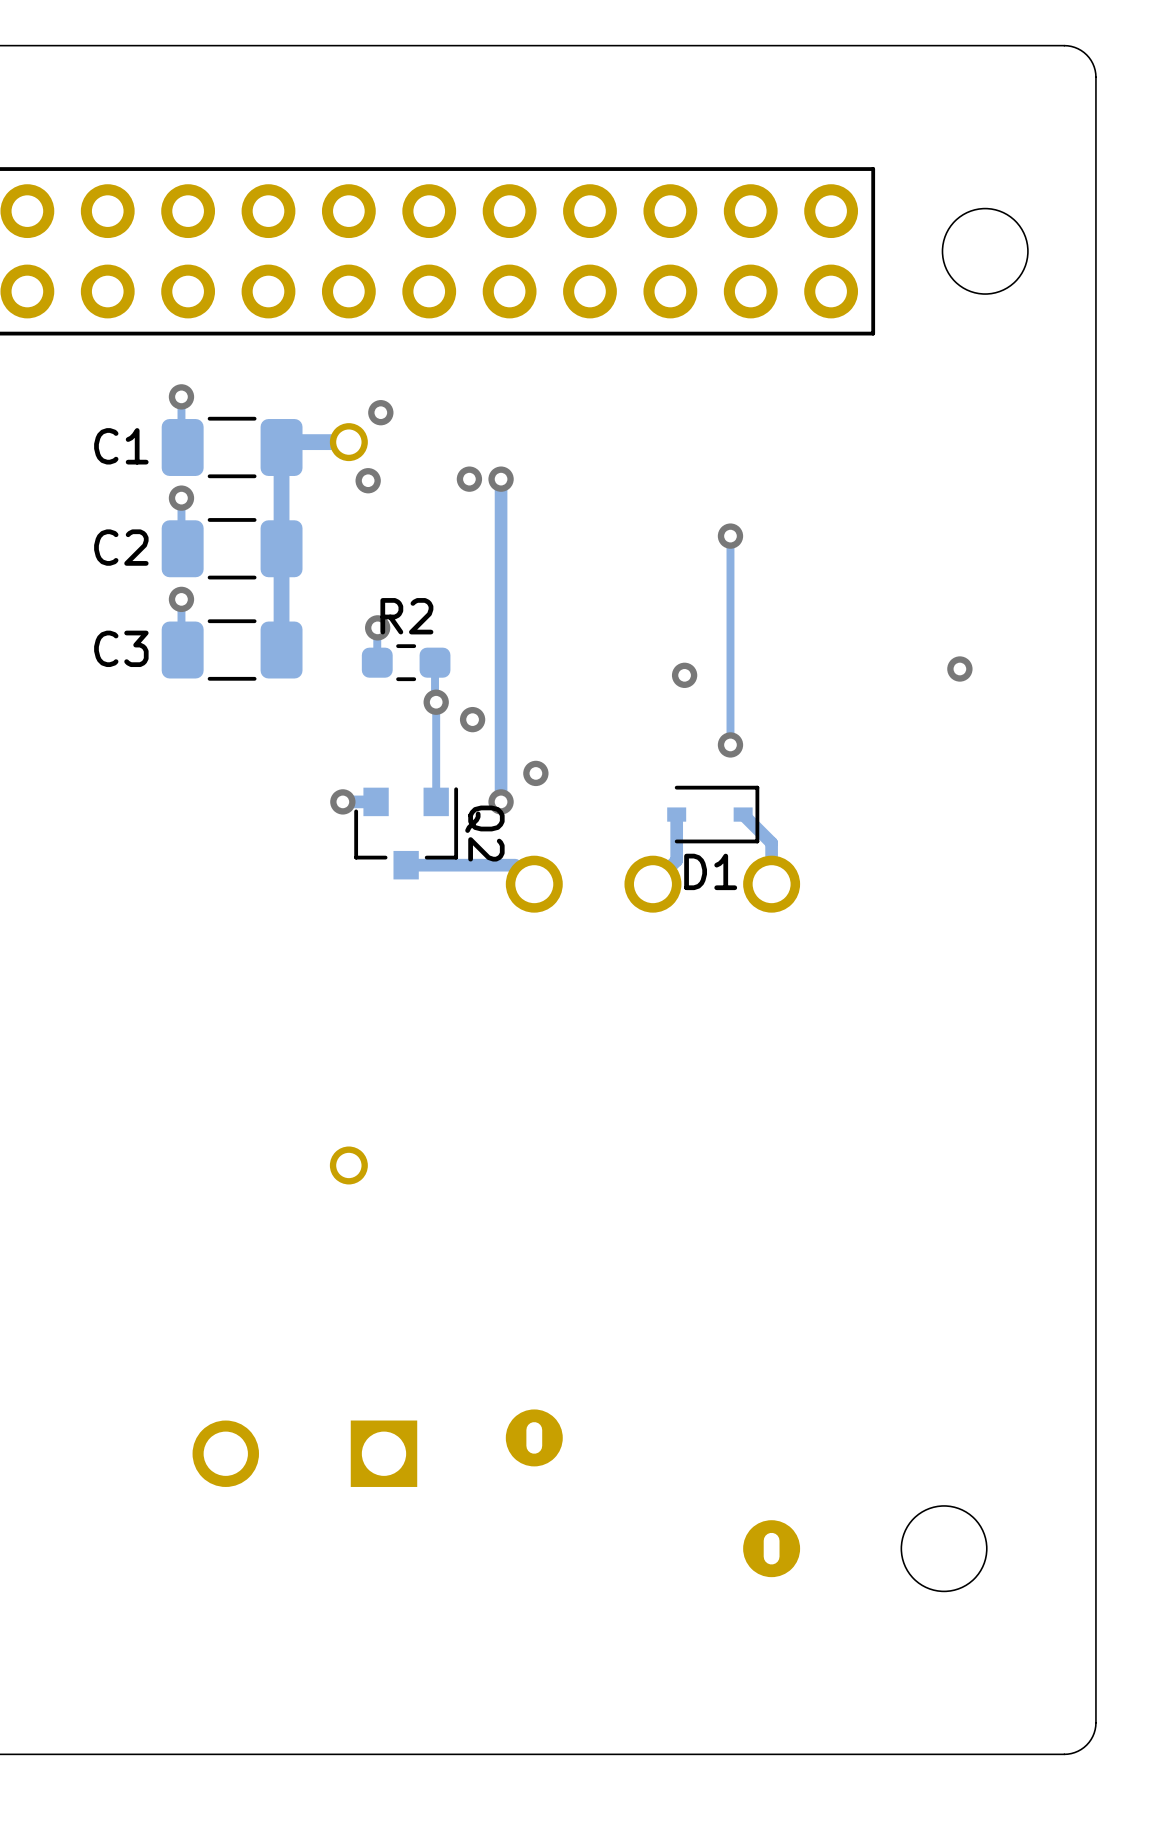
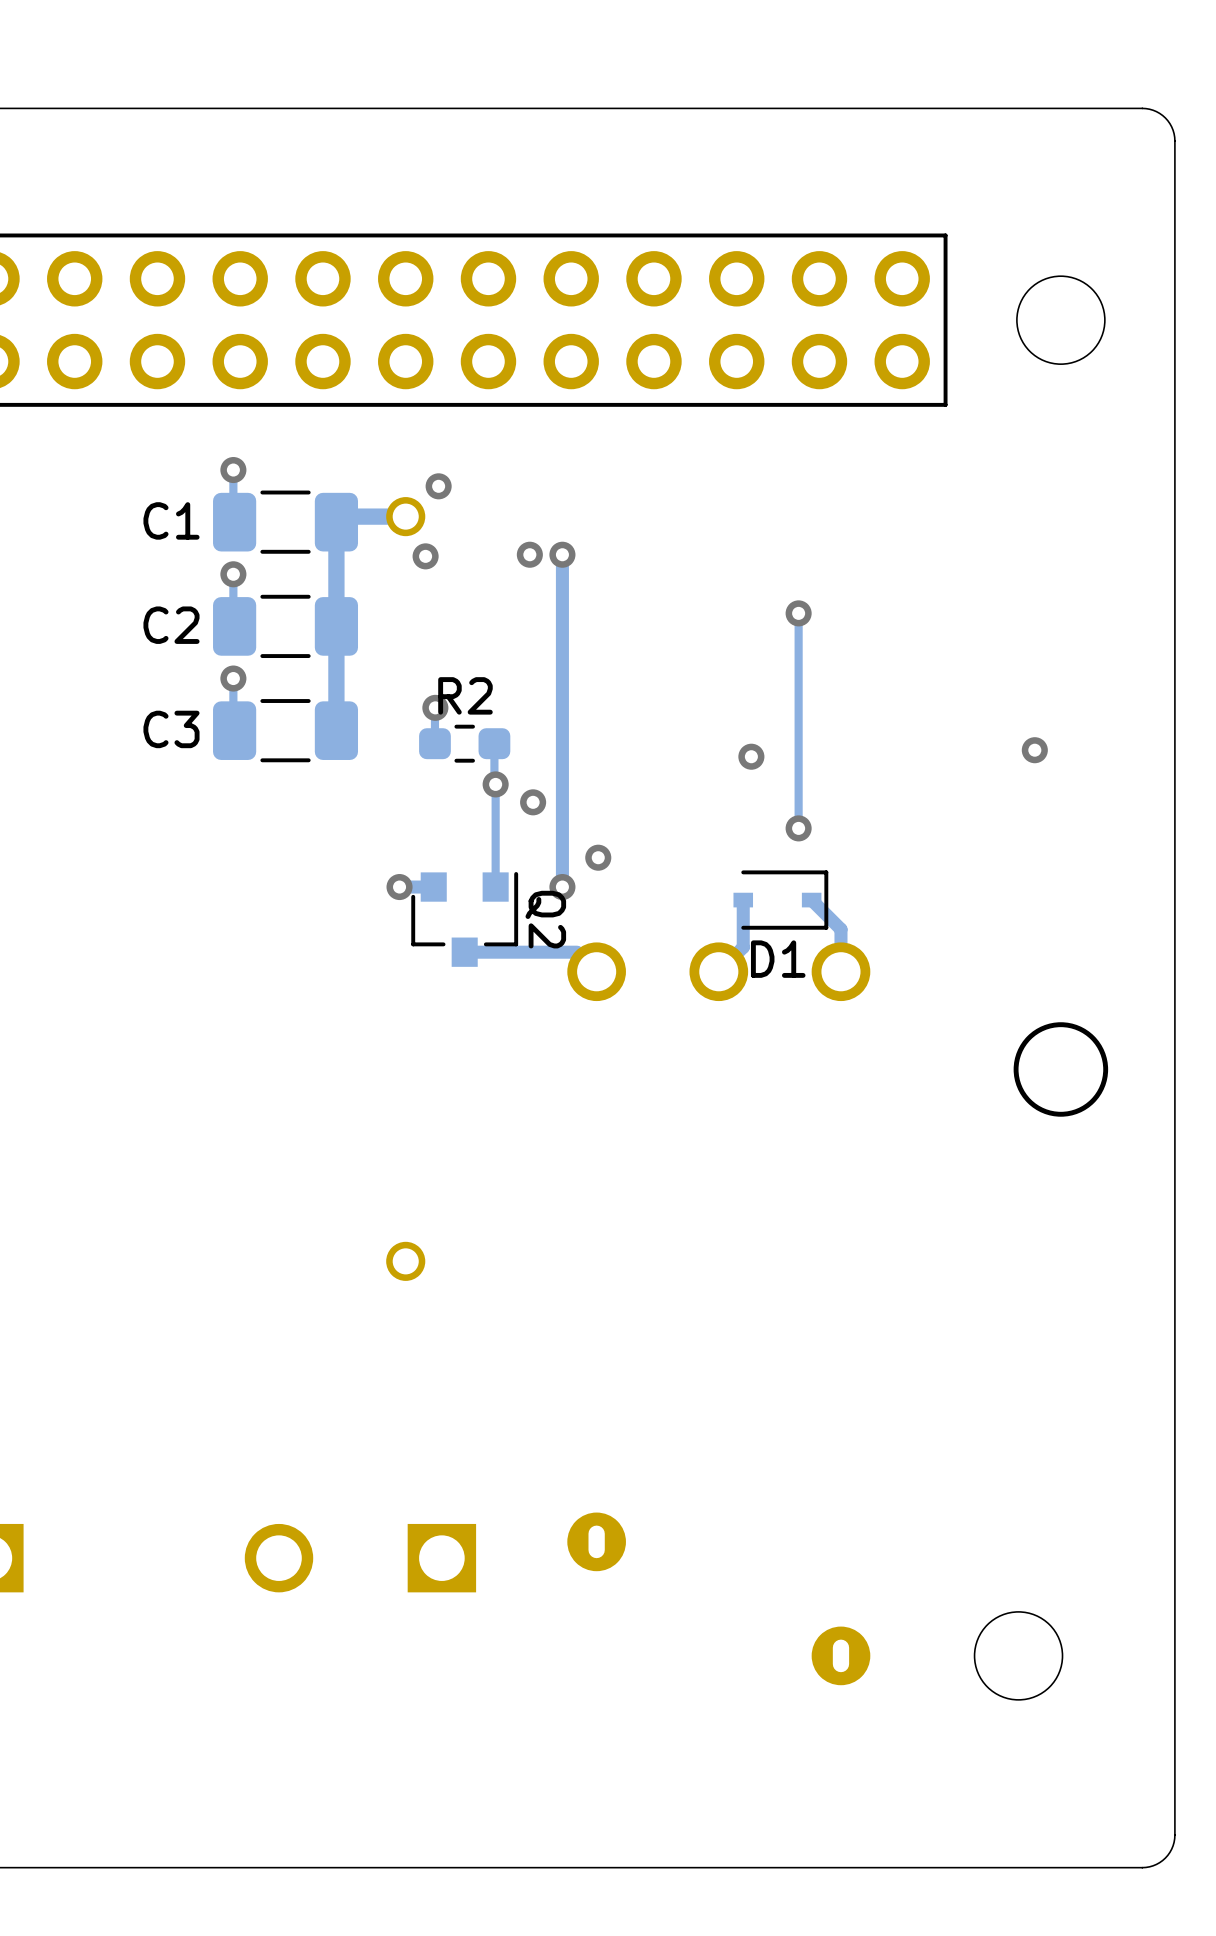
round board edge: none -> [1013, 1022, 1109, 1117]

